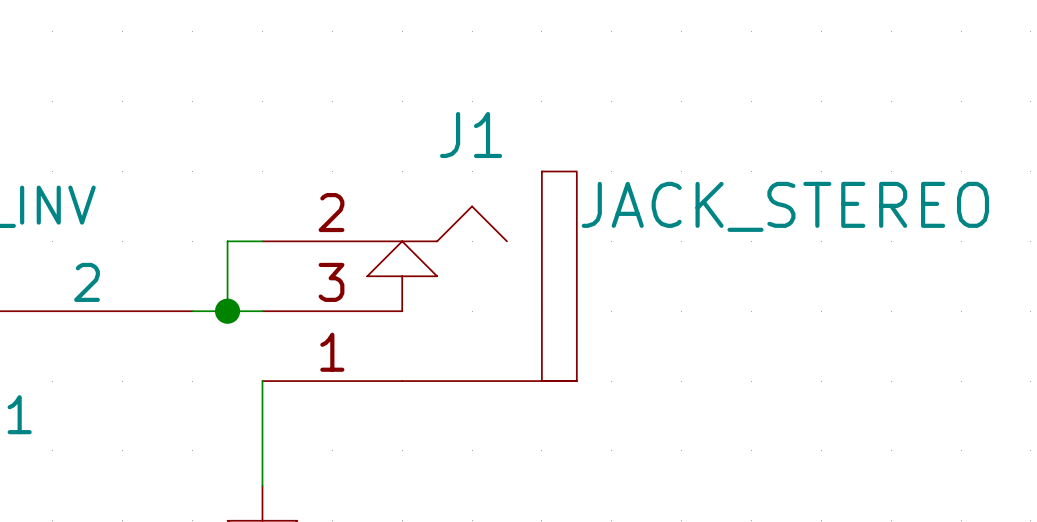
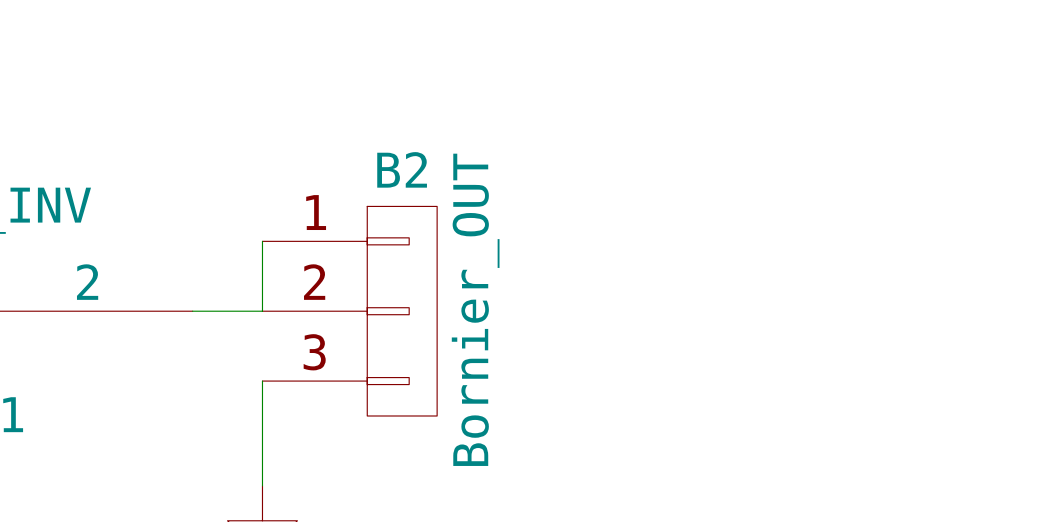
wire: (262, 241) (227, 241) (227, 311) -> (262, 241) (262, 311)
J1: JACK_STEREO (419, 276) -> none
junction: (227, 311) -> none
B2: none -> Bornier_OUT (349, 311)

